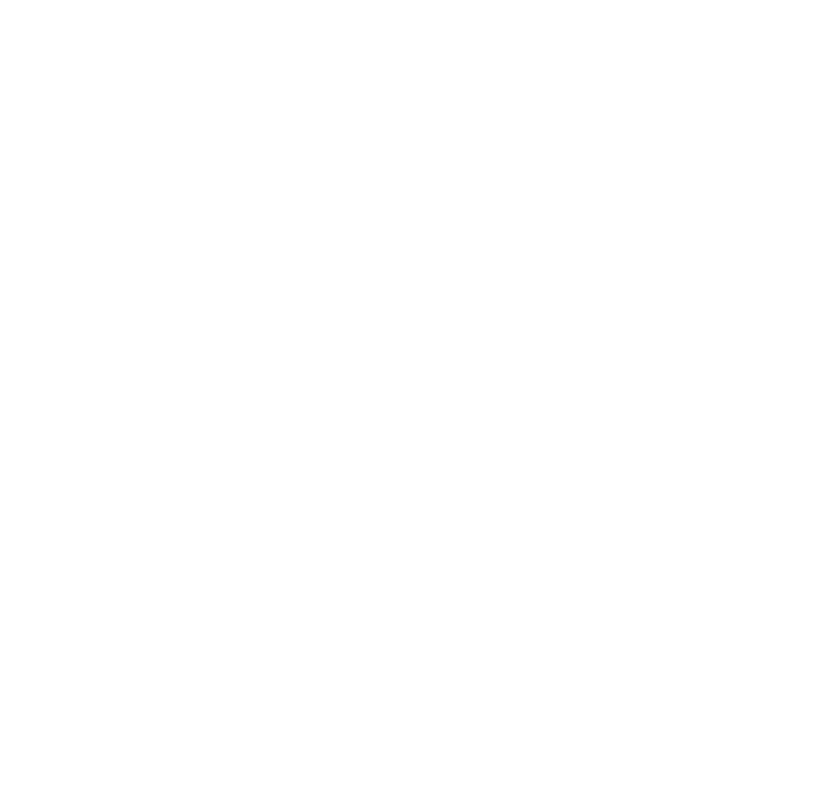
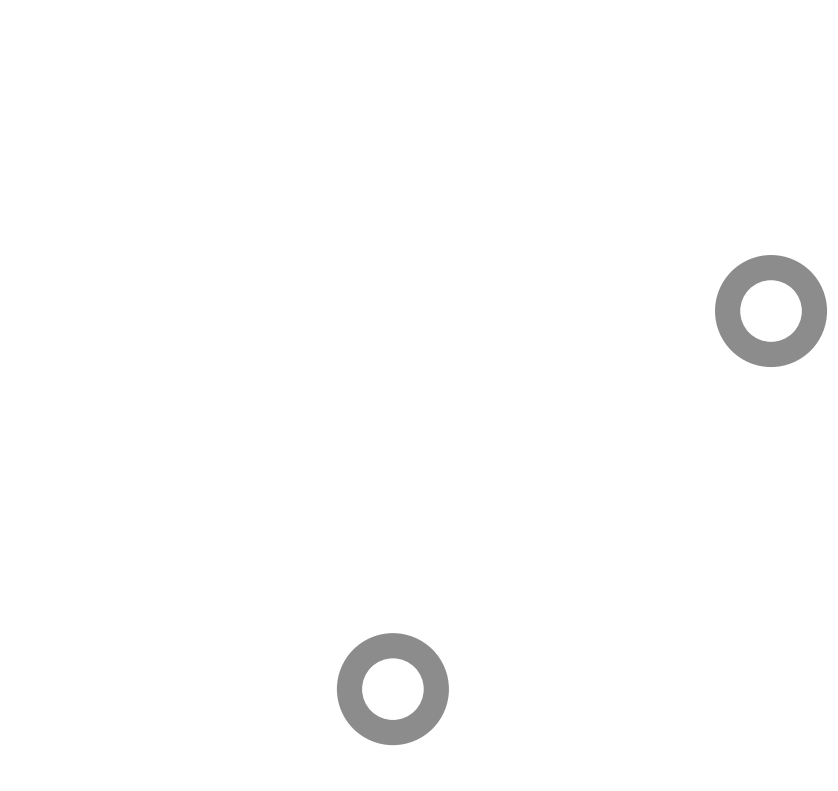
via: none -> (771, 311)
via: none -> (392, 689)

